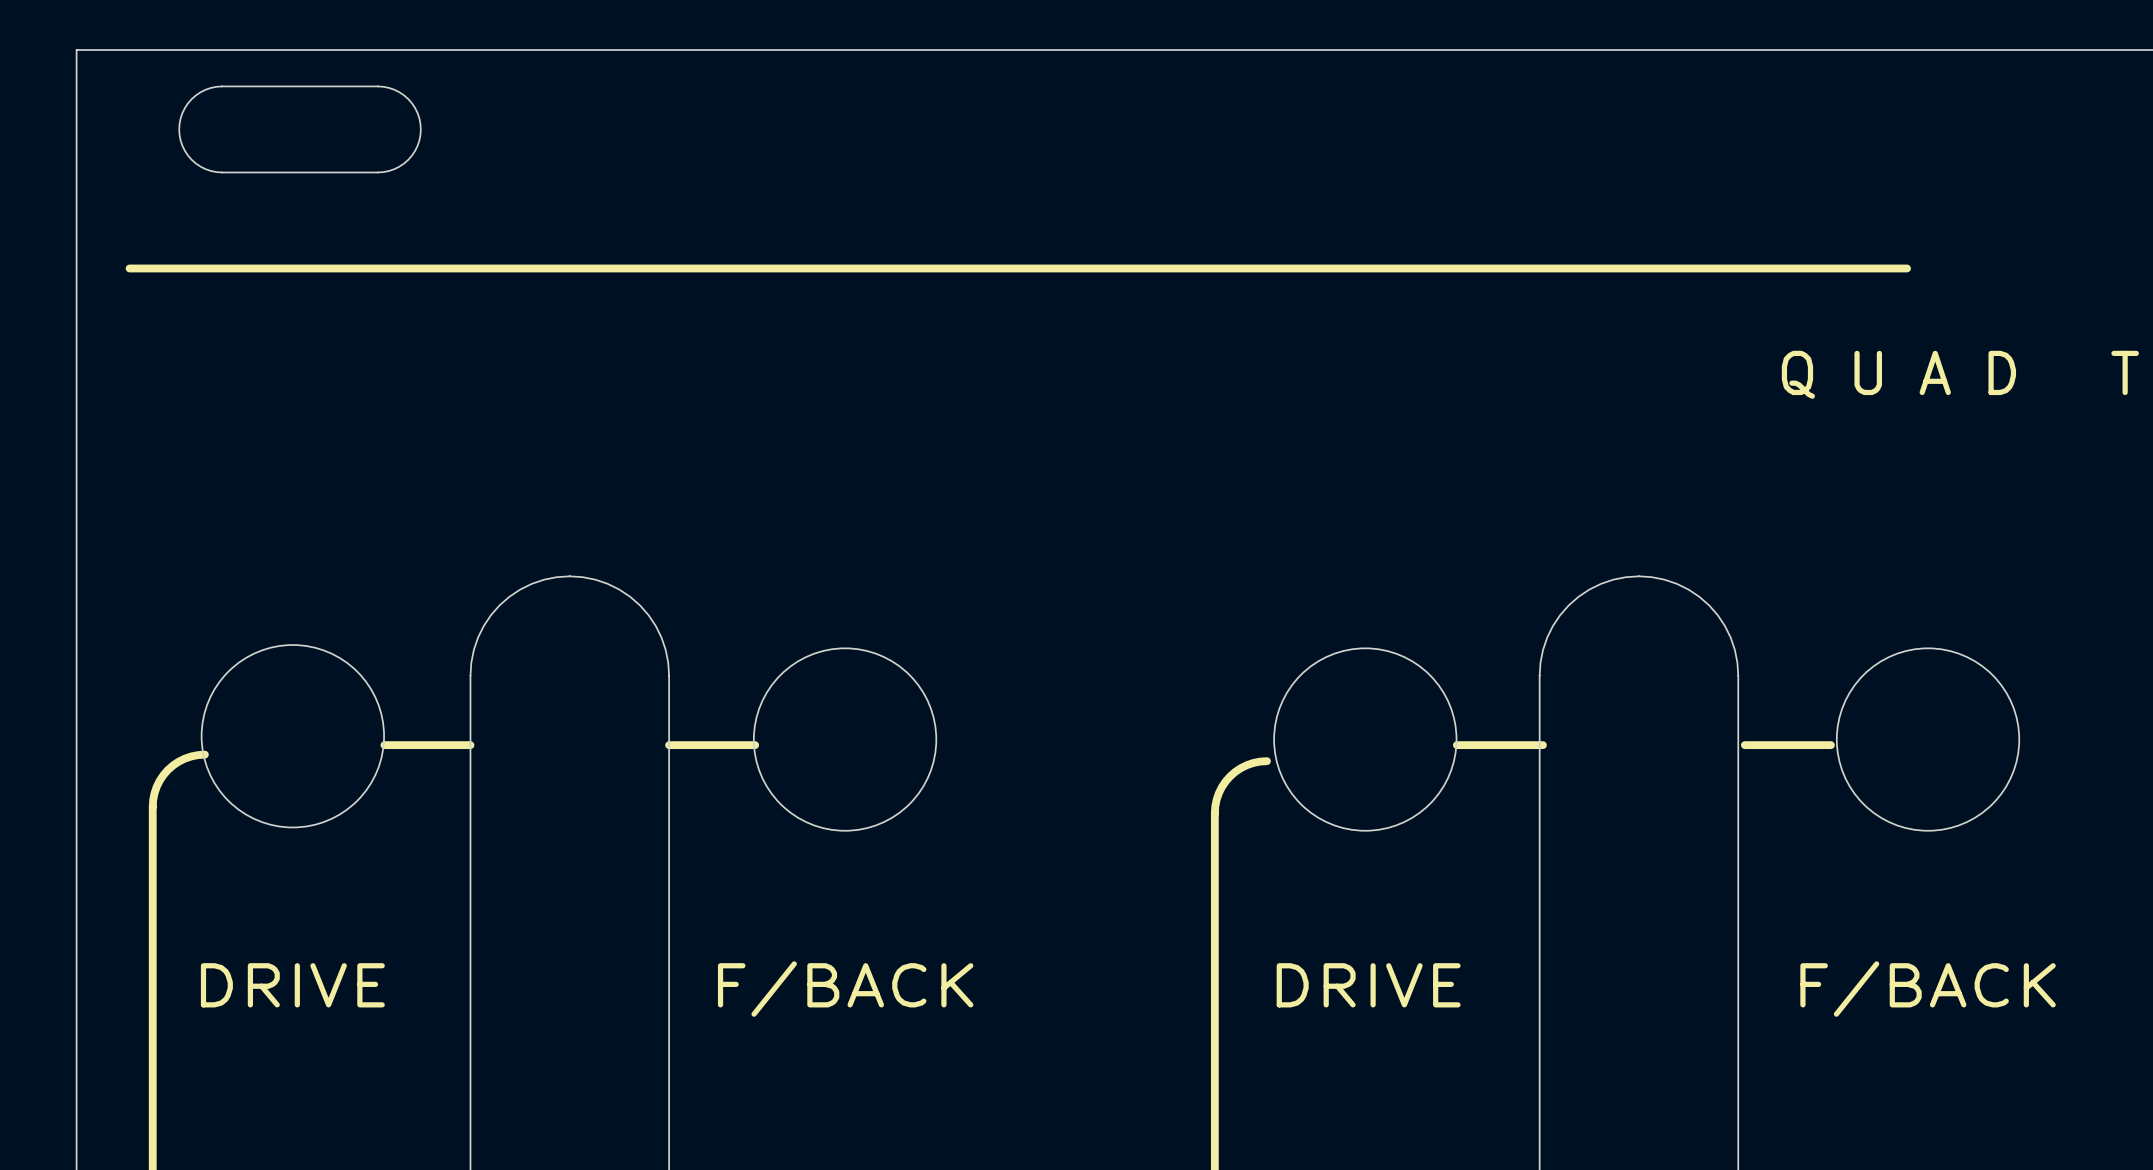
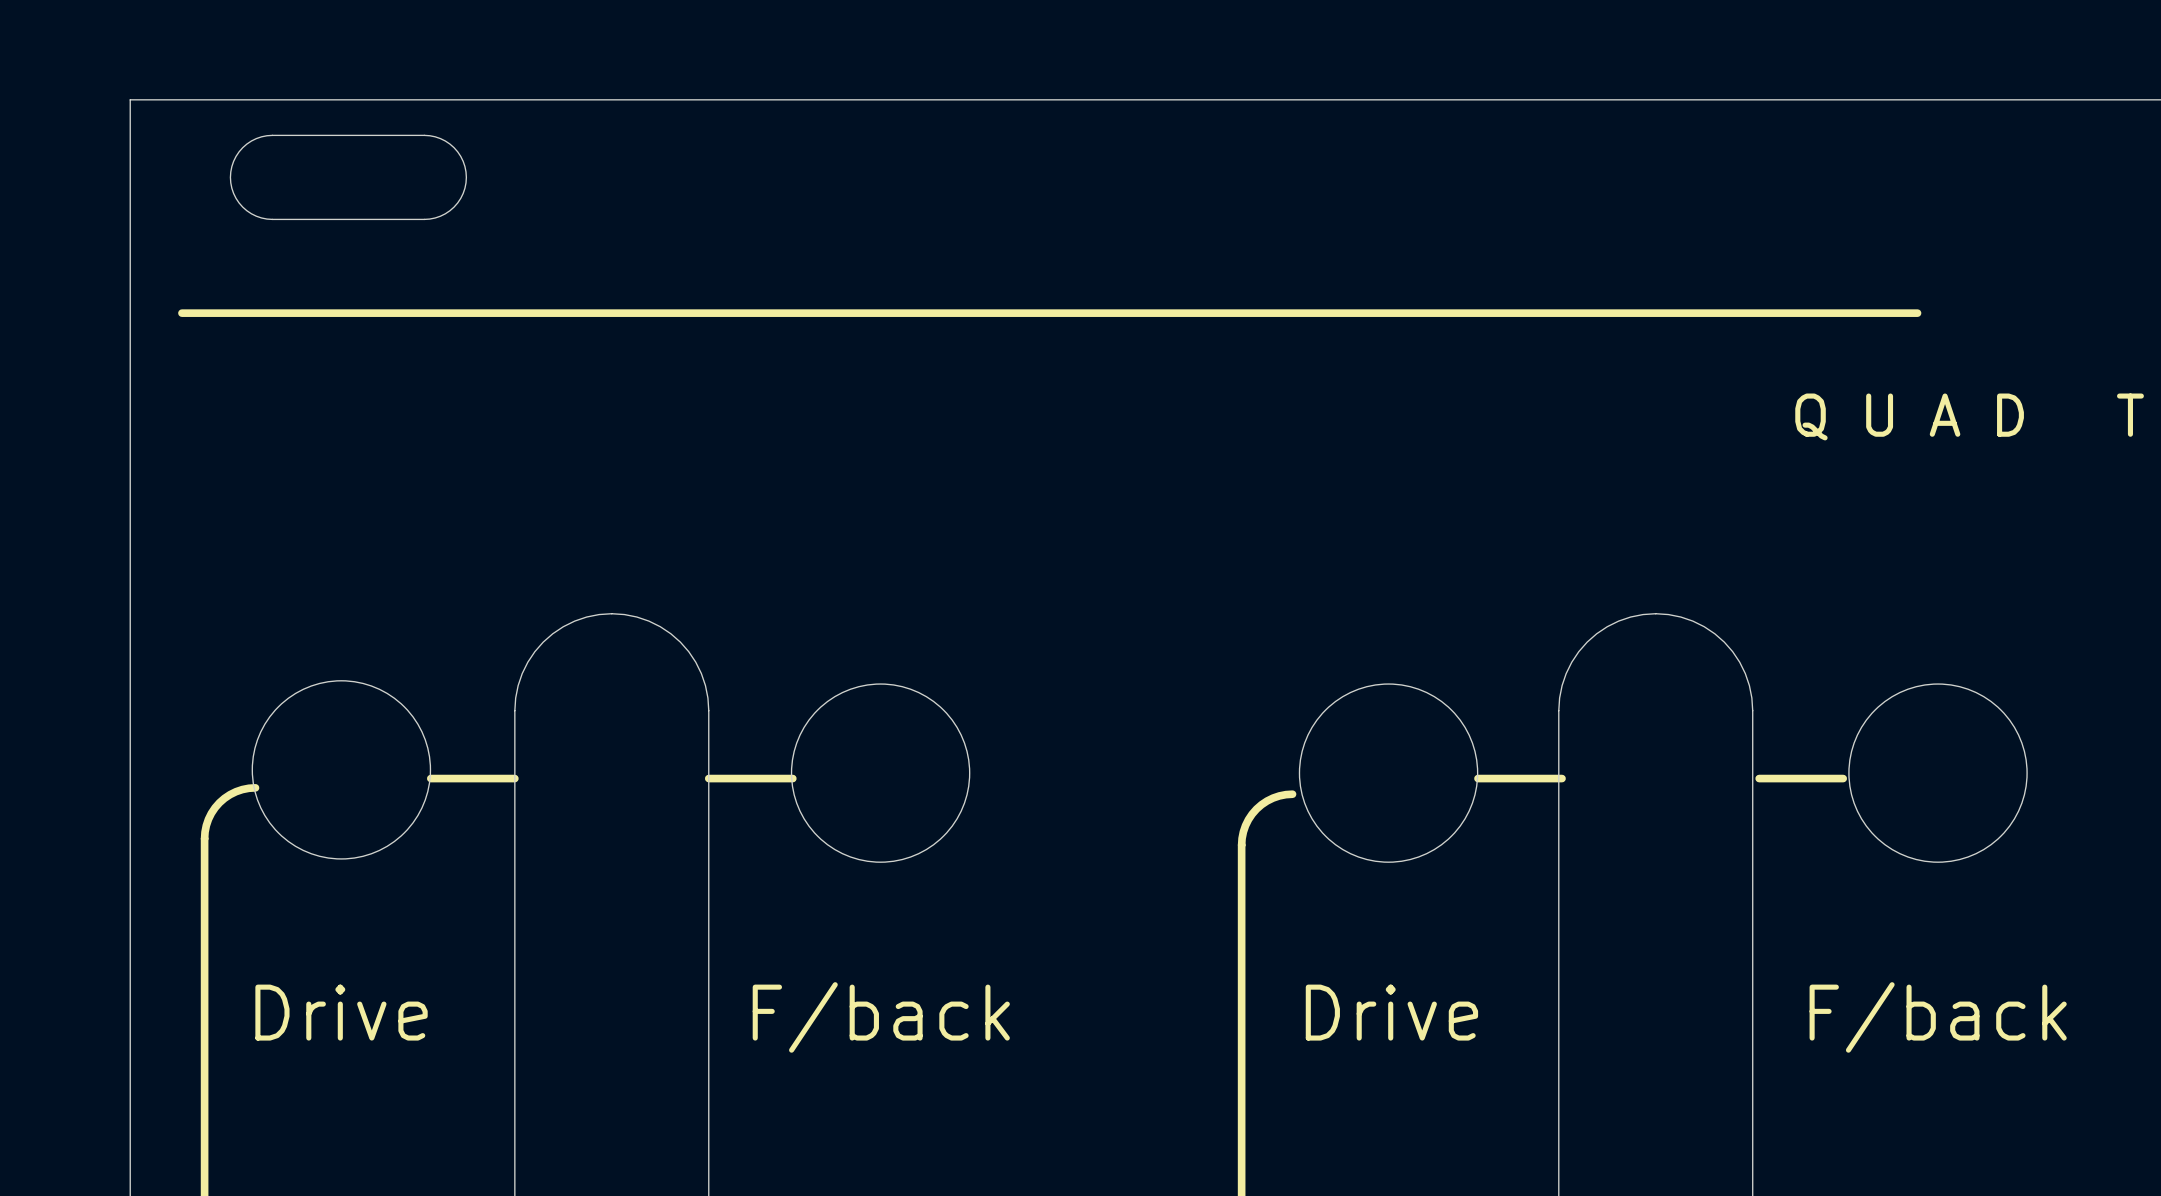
text: DRIVE (292, 985) -> Drive (341, 1012)
text: DRIVE (1368, 985) -> Drive (1391, 1012)
text: F/BACK (845, 989) -> F/back (881, 1017)
text: F/BACK (1928, 989) -> F/back (1938, 1017)

